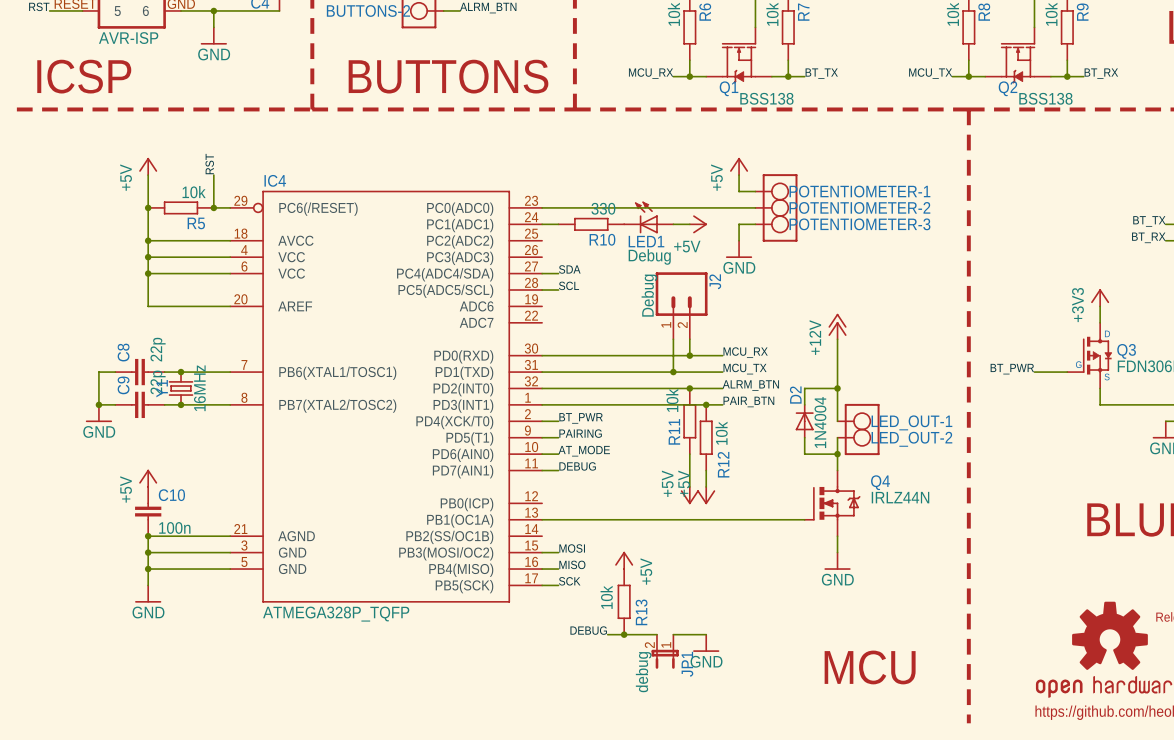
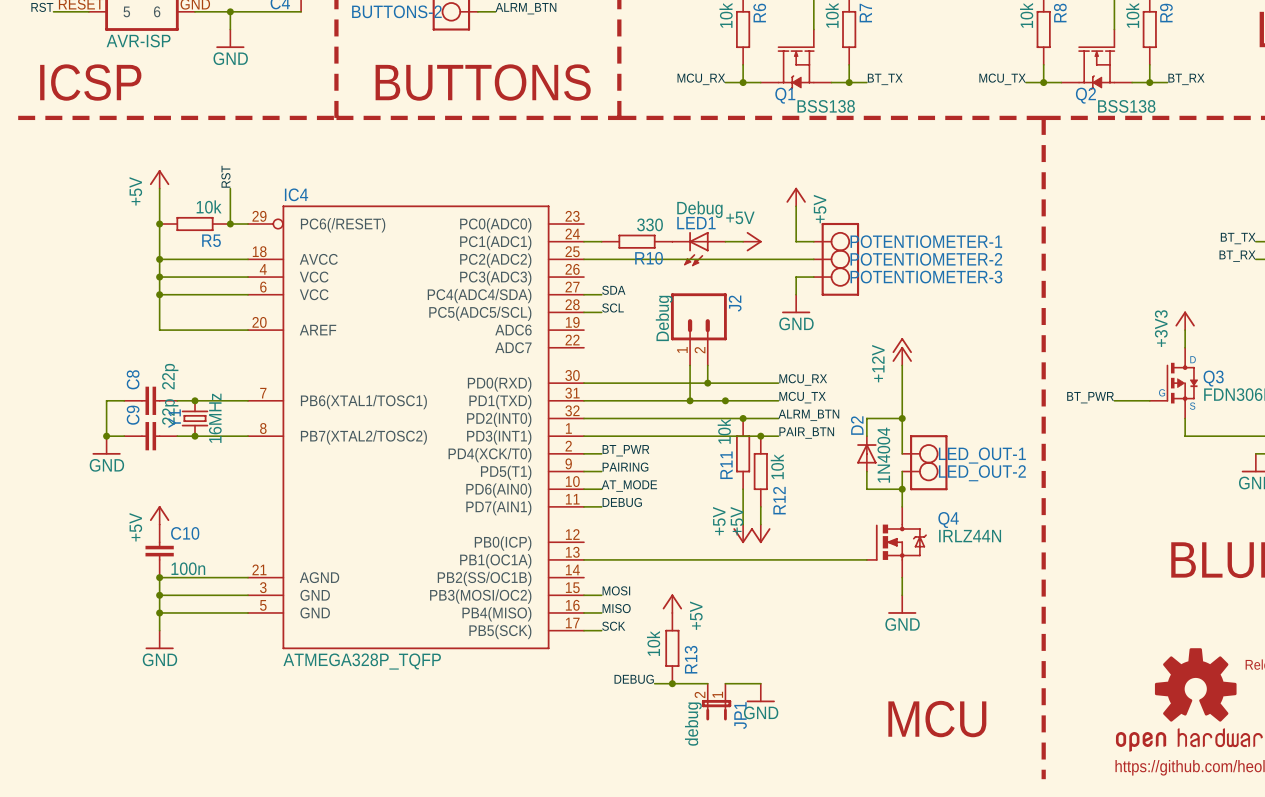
power symbol position: +5V (739, 166) -> +5V (796, 197)
wire: (739, 175) (739, 191) (755, 191) -> none
power symbol text position: +5V (716, 177) -> +5V (820, 209)
POTENTIOMETER-1: (772, 191) -> none
wire: (542, 207) (755, 207) -> (583, 259) (813, 259)
line: (763, 207) (763, 175) (796, 175) (796, 207) -> (822, 224) (858, 224)
POTENTIOMETER-2 position: (772, 207) -> (831, 259)
LED1 flip: as is (646, 217) -> up-down (696, 249)
wire: (739, 224) (739, 240) -> (796, 241) (796, 206)
POTENTIOMETER-3 name: POTENTIOMETER-3 (859, 224) -> POTENTIOMETER-1 (926, 241)
line: (763, 240) (796, 240) -> (822, 259) (822, 294) (858, 294) (858, 259)
power symbol text position: +5V (687, 246) -> +5V (740, 217)
power symbol position: GND (739, 249) -> GND (796, 304)
wire: none -> (813, 277) (796, 277) (796, 294)
POTENTIOMETER-3: none -> (831, 277)
J2 position: (681, 305) -> (698, 329)
wire: (673, 339) (673, 372) -> (690, 365) (690, 400)
wire: (689, 339) (689, 355) -> (707, 365) (707, 383)
junction: none -> (707, 383)
junction: (689, 355) -> none
junction: none -> (690, 400)

